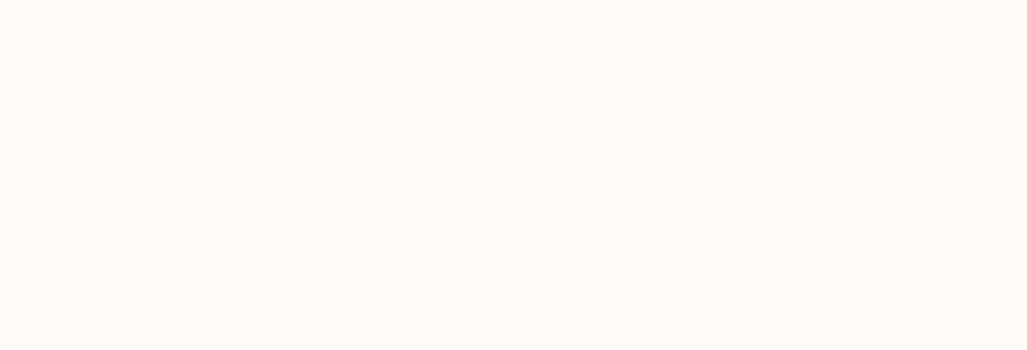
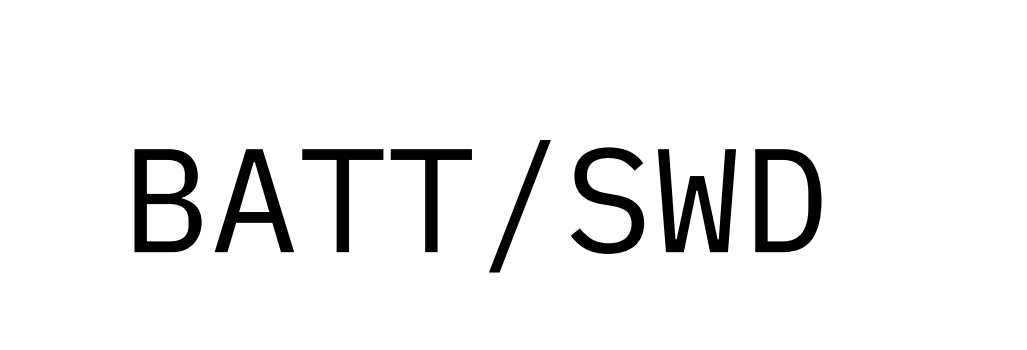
text: none -> BATT/SWD (478, 206)

